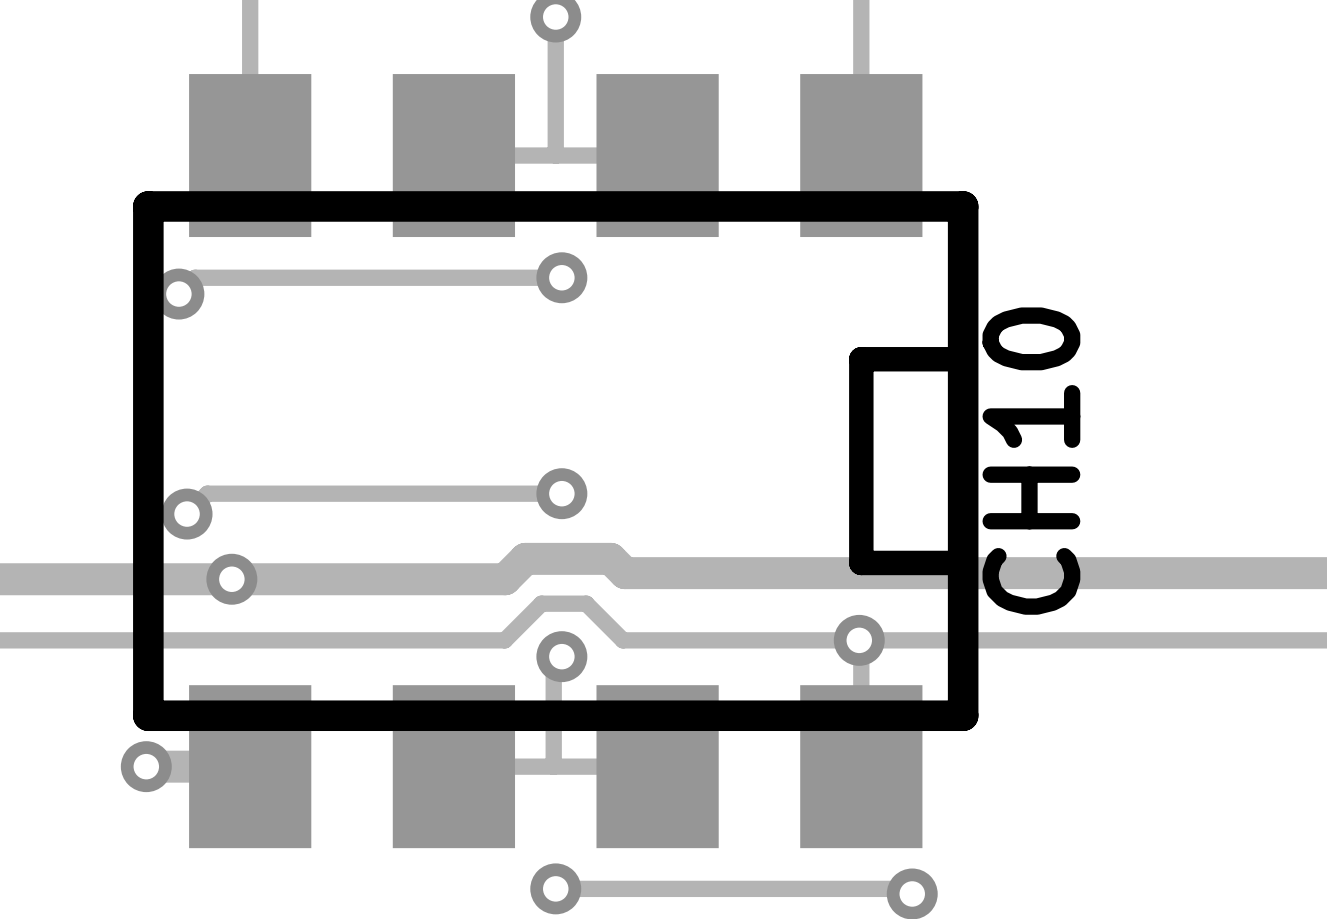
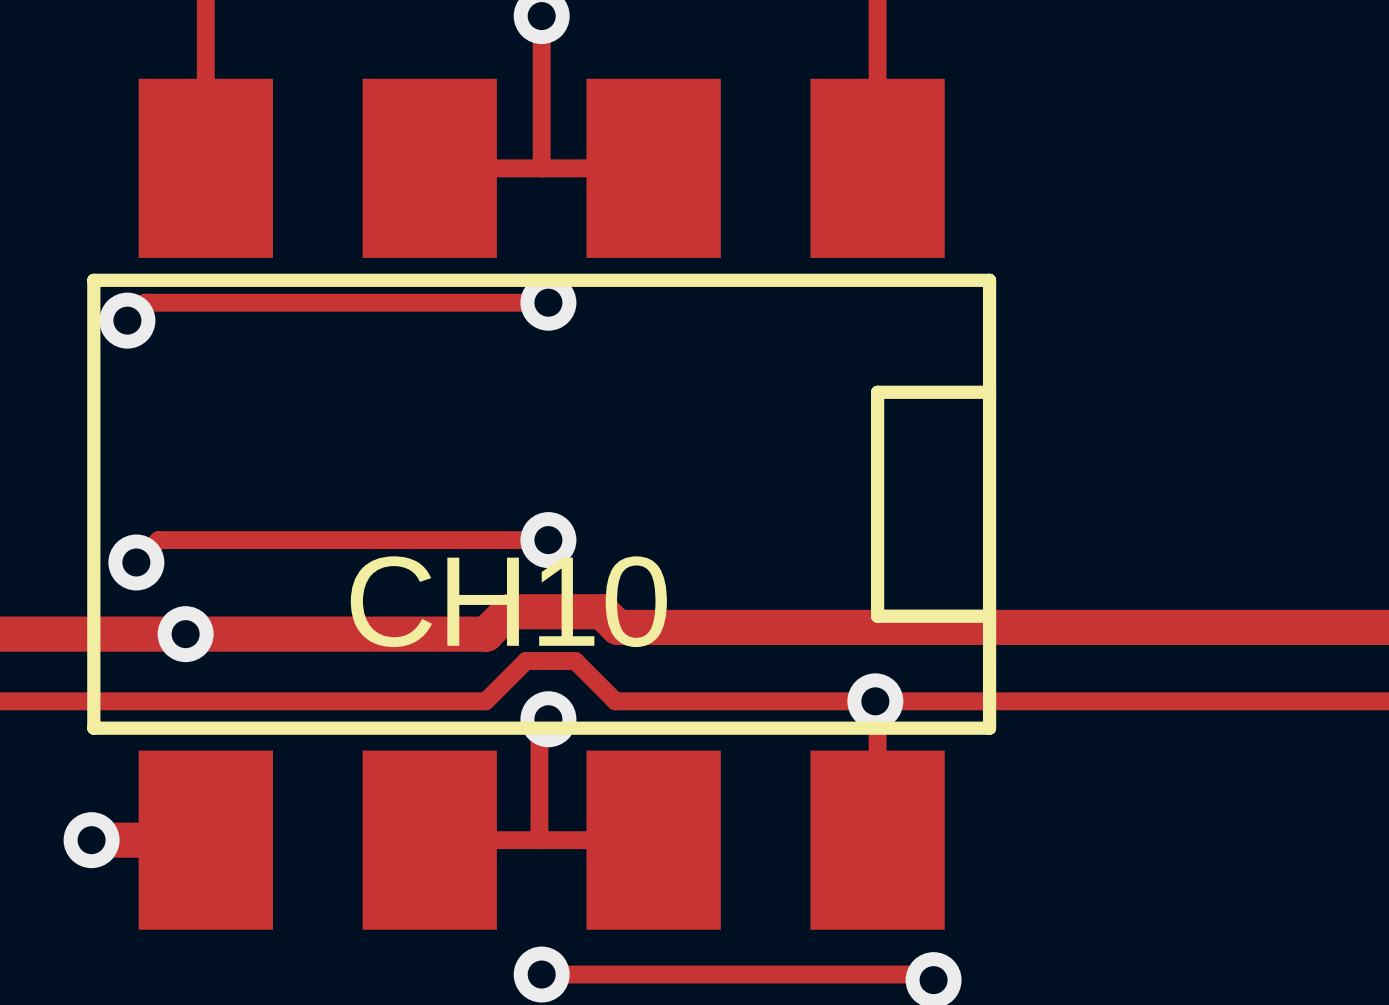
CH10 footprint: [133, 74, 979, 849] -> [87, 78, 997, 930]
CH10 name rotation: 0° (1031, 461) -> 90° clockwise (508, 601)
CH10 name position: CH10 (1031, 461) -> CH10 (508, 601)

